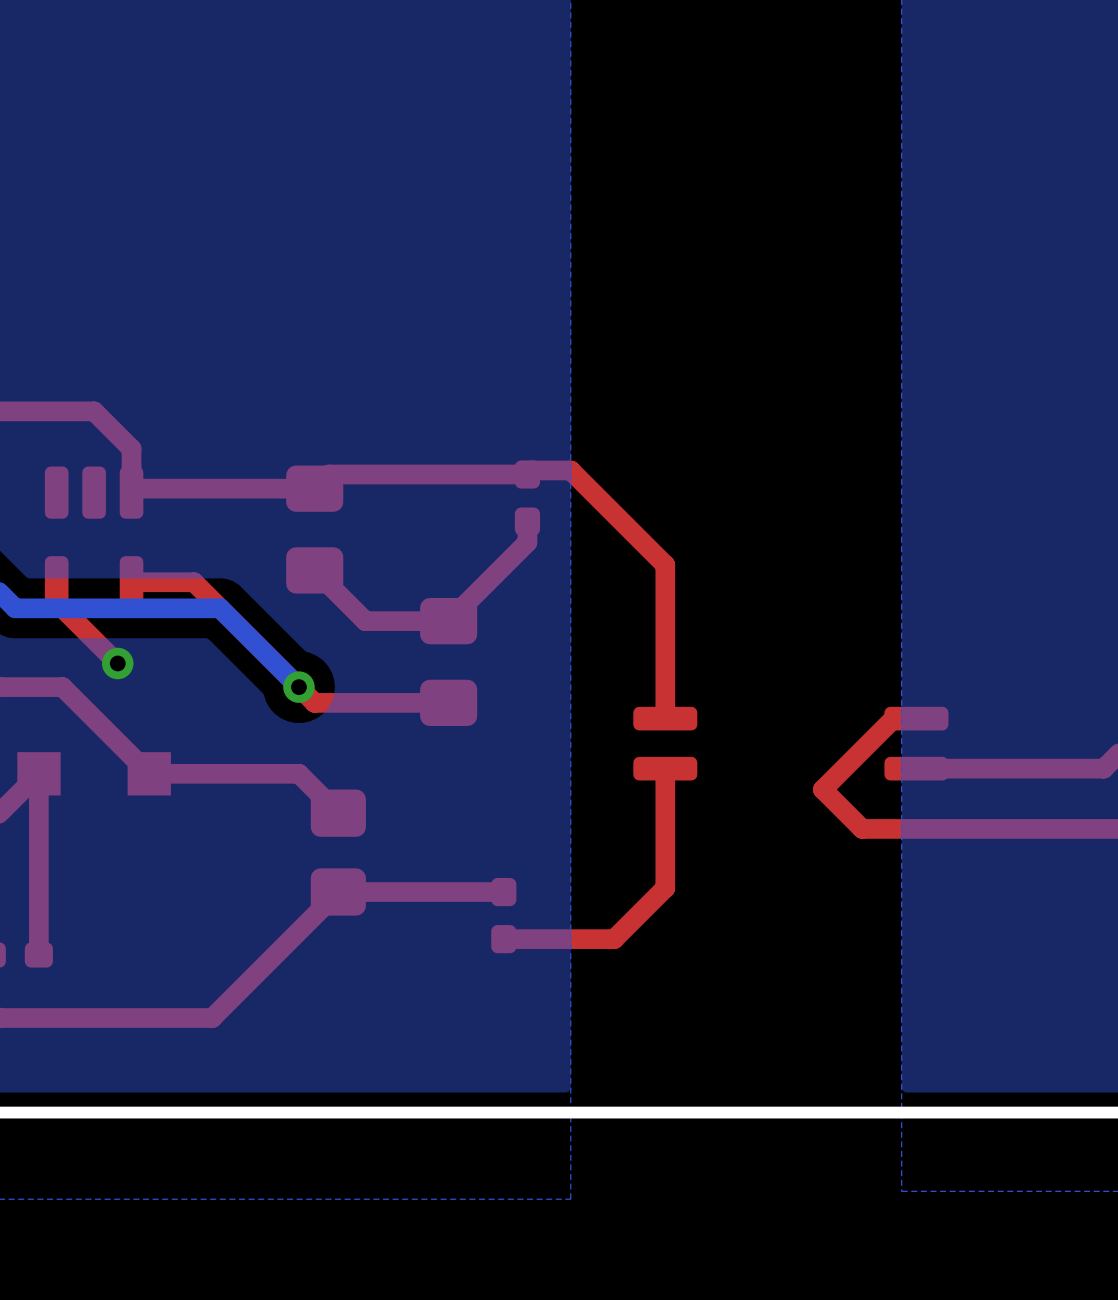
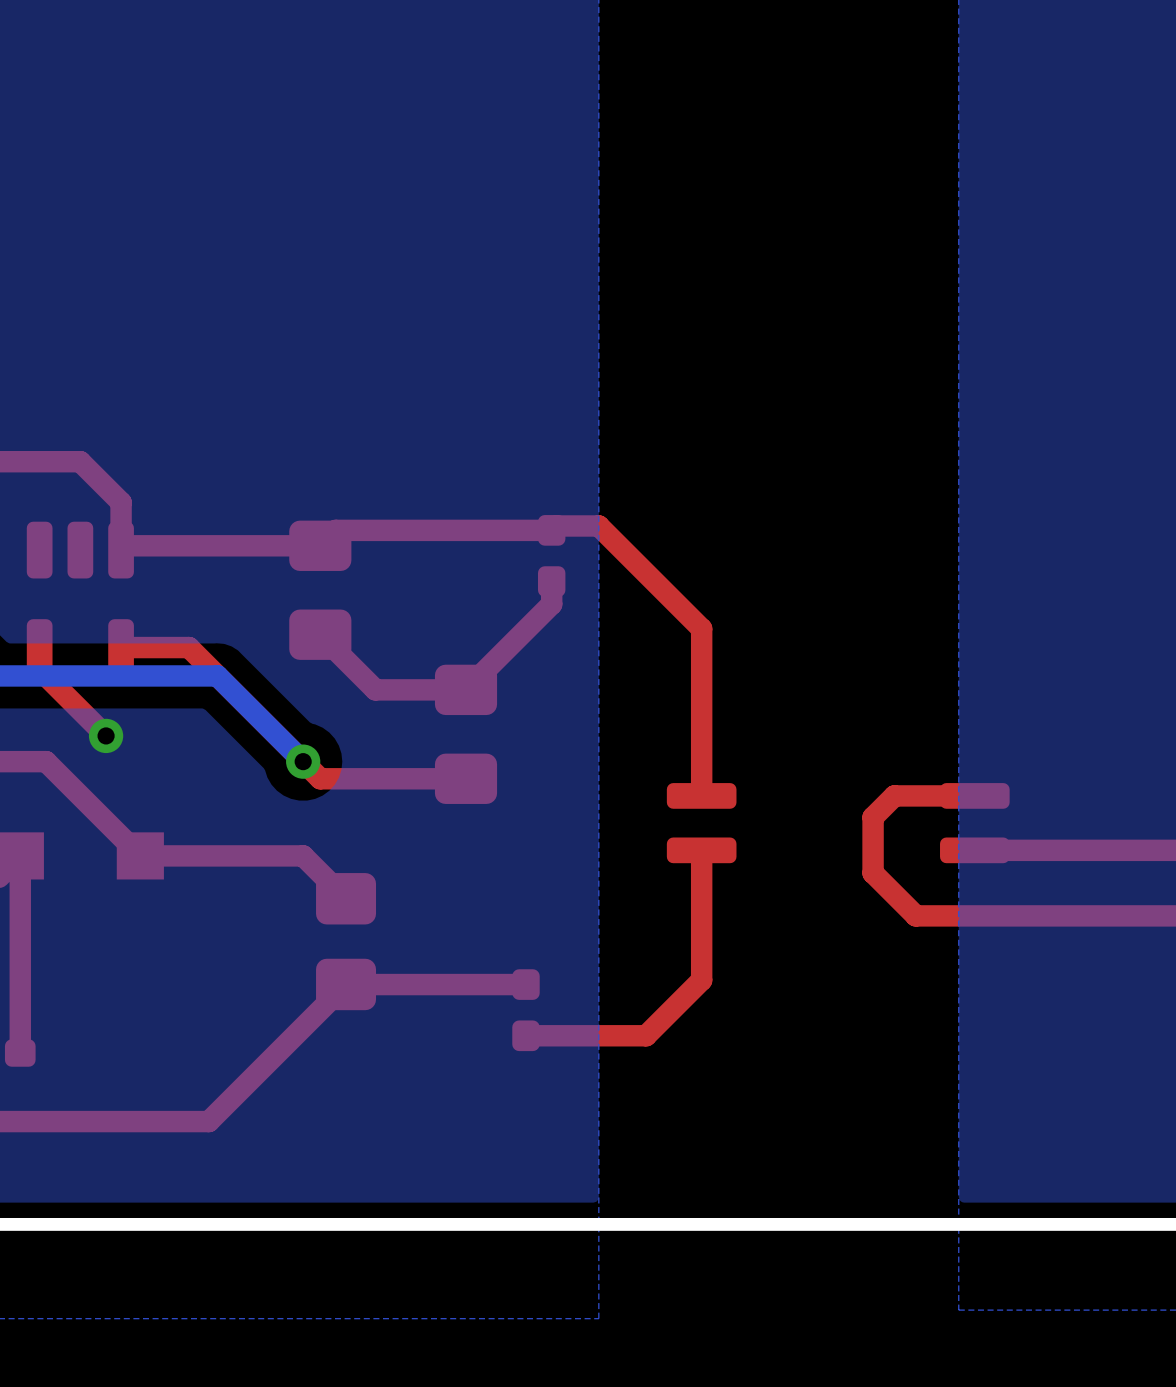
top track: (893, 718) (822, 789) -> (950, 795) (894, 795) (873, 817) (873, 873)

